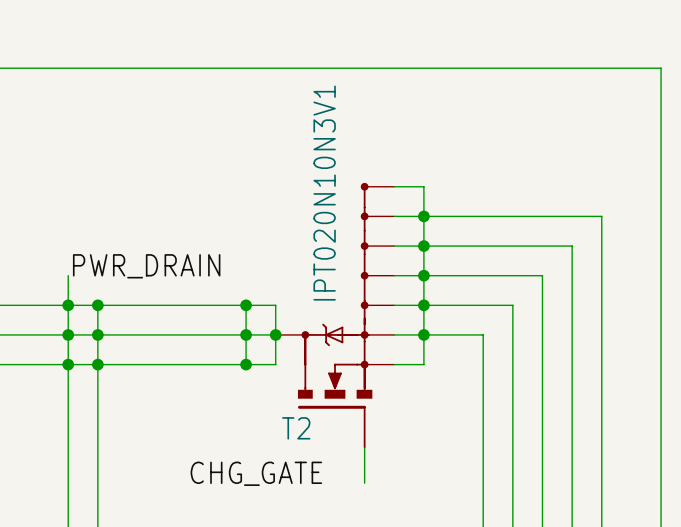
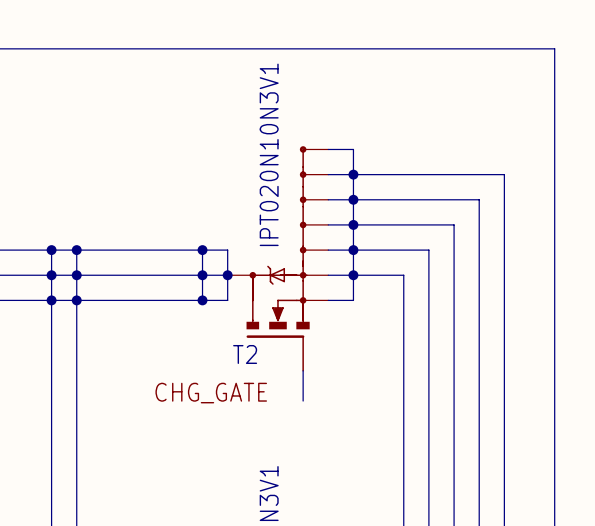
label: PWR_DRAIN (146, 266) -> none
wire: (68, 275) (68, 305) -> none

